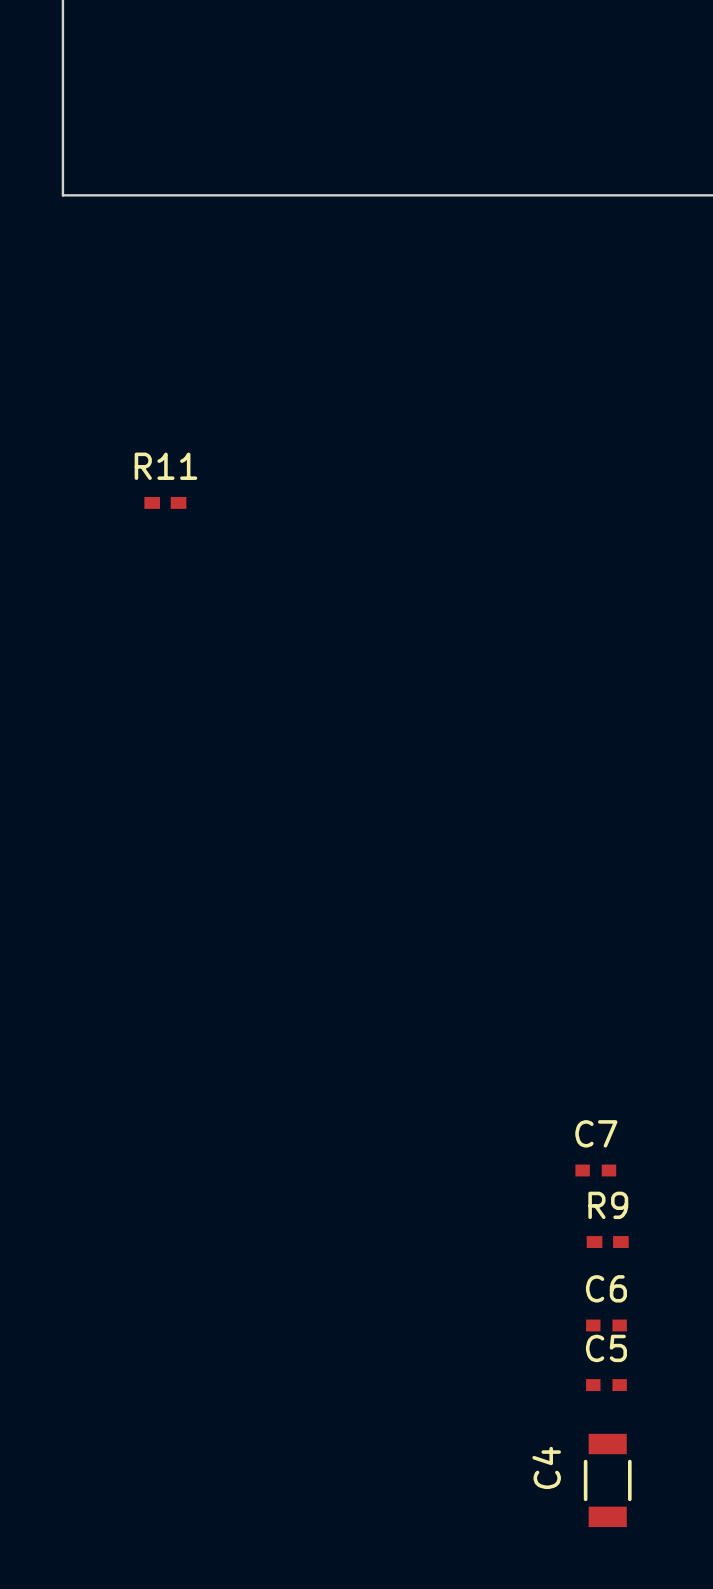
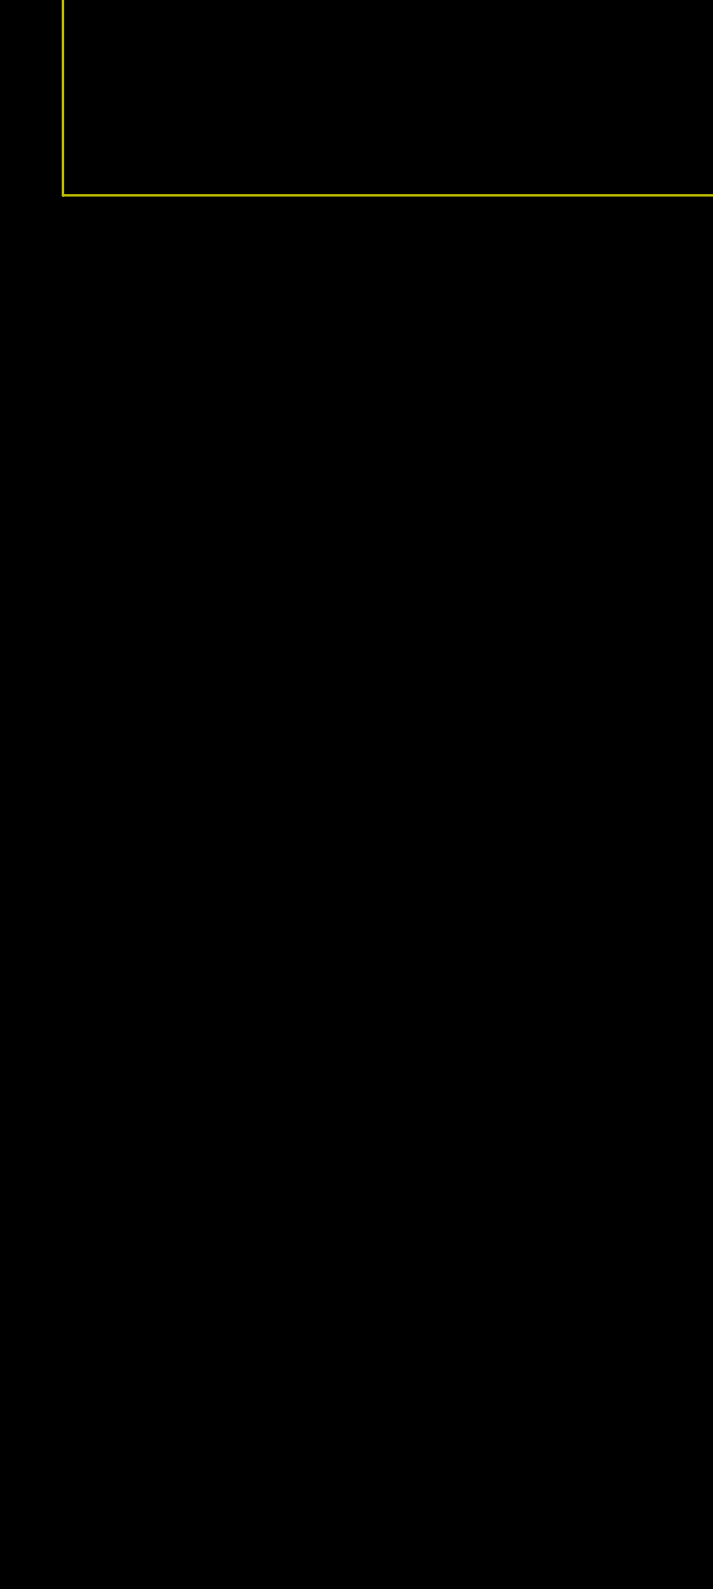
R11: (165, 502) -> none
C7: (595, 1170) -> none
R9: (607, 1242) -> none
C6: (606, 1325) -> none
C5: (606, 1385) -> none
C4: (607, 1480) -> none

